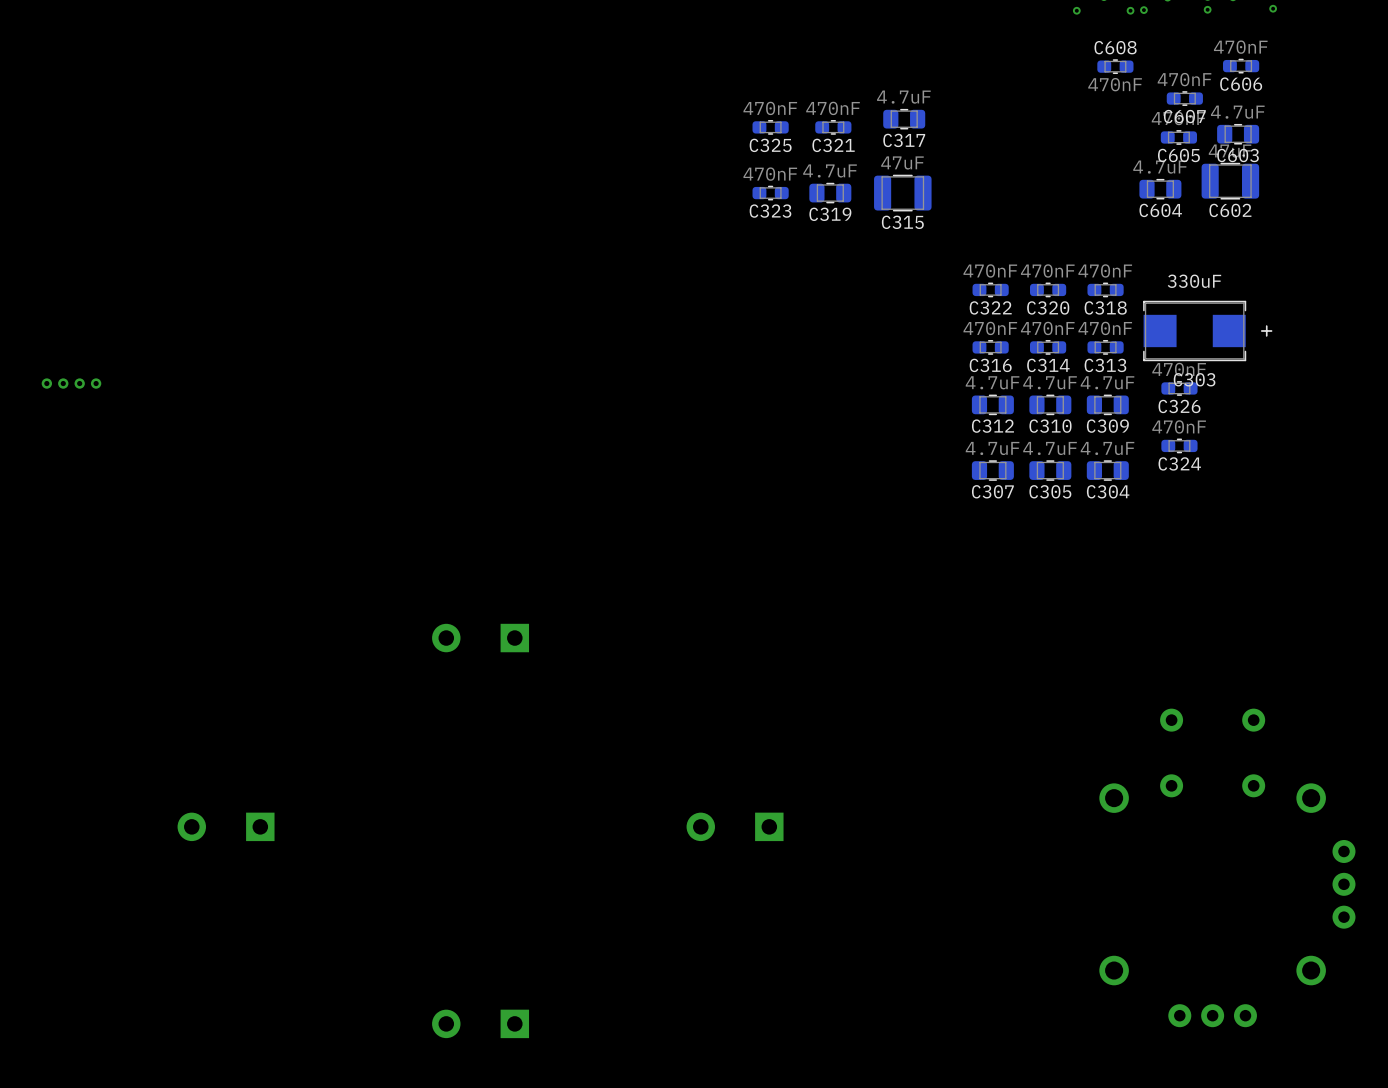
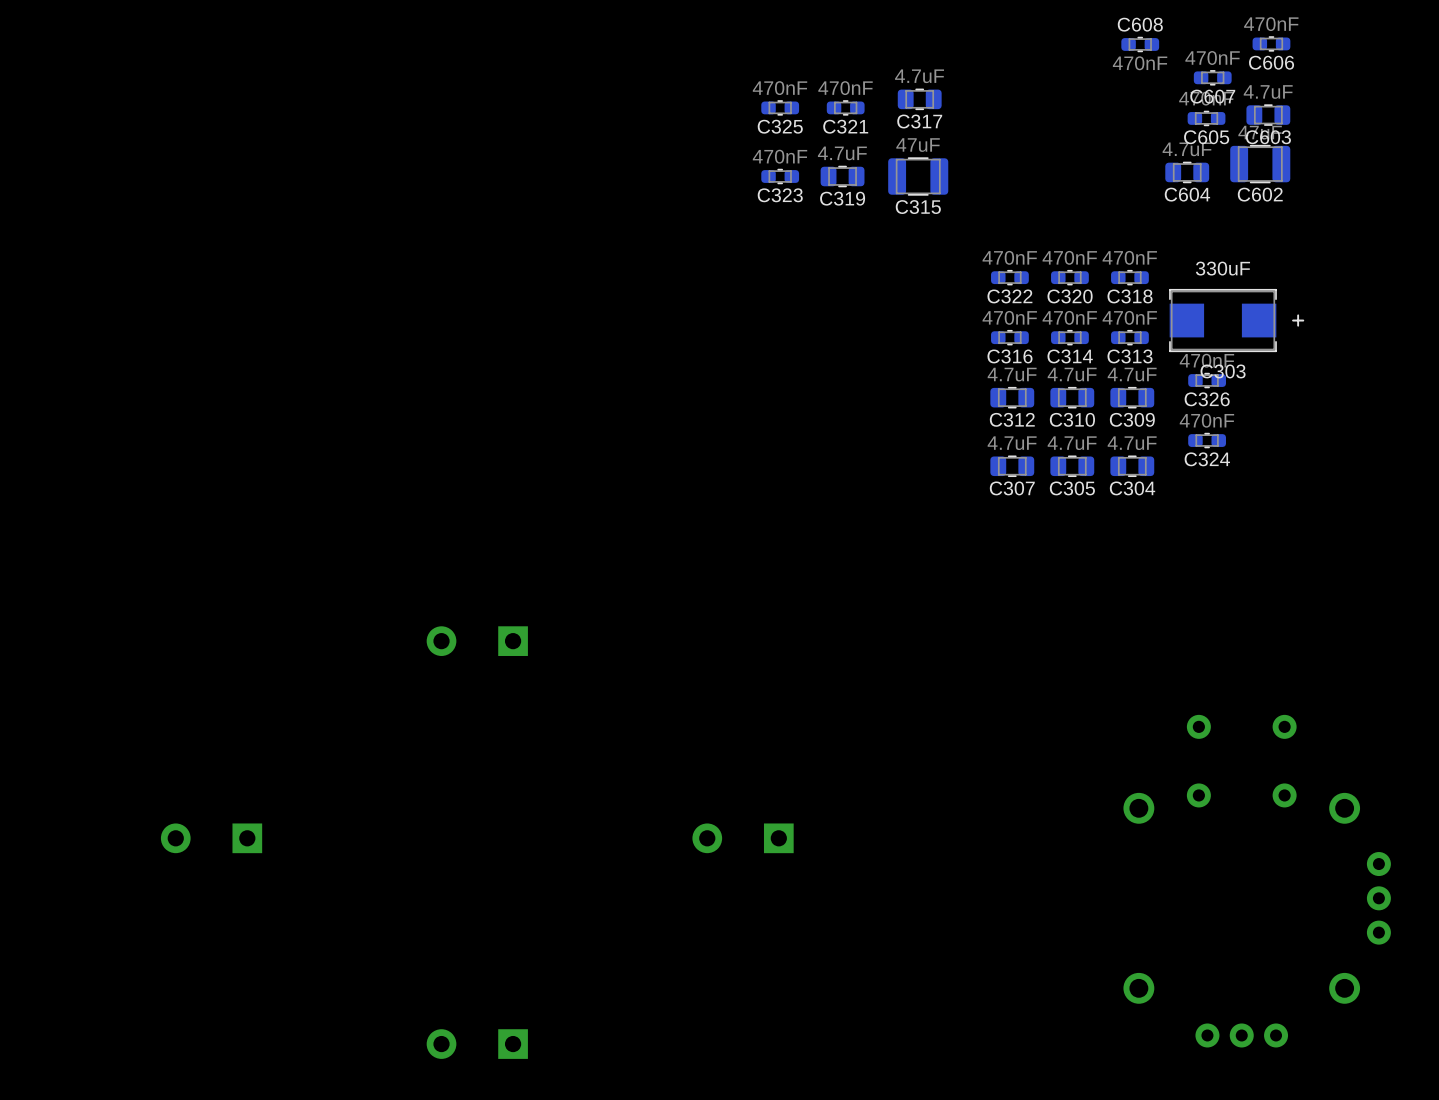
via: (46, 383) -> none
via: (63, 383) -> none
via: (79, 383) -> none
via: (96, 383) -> none

